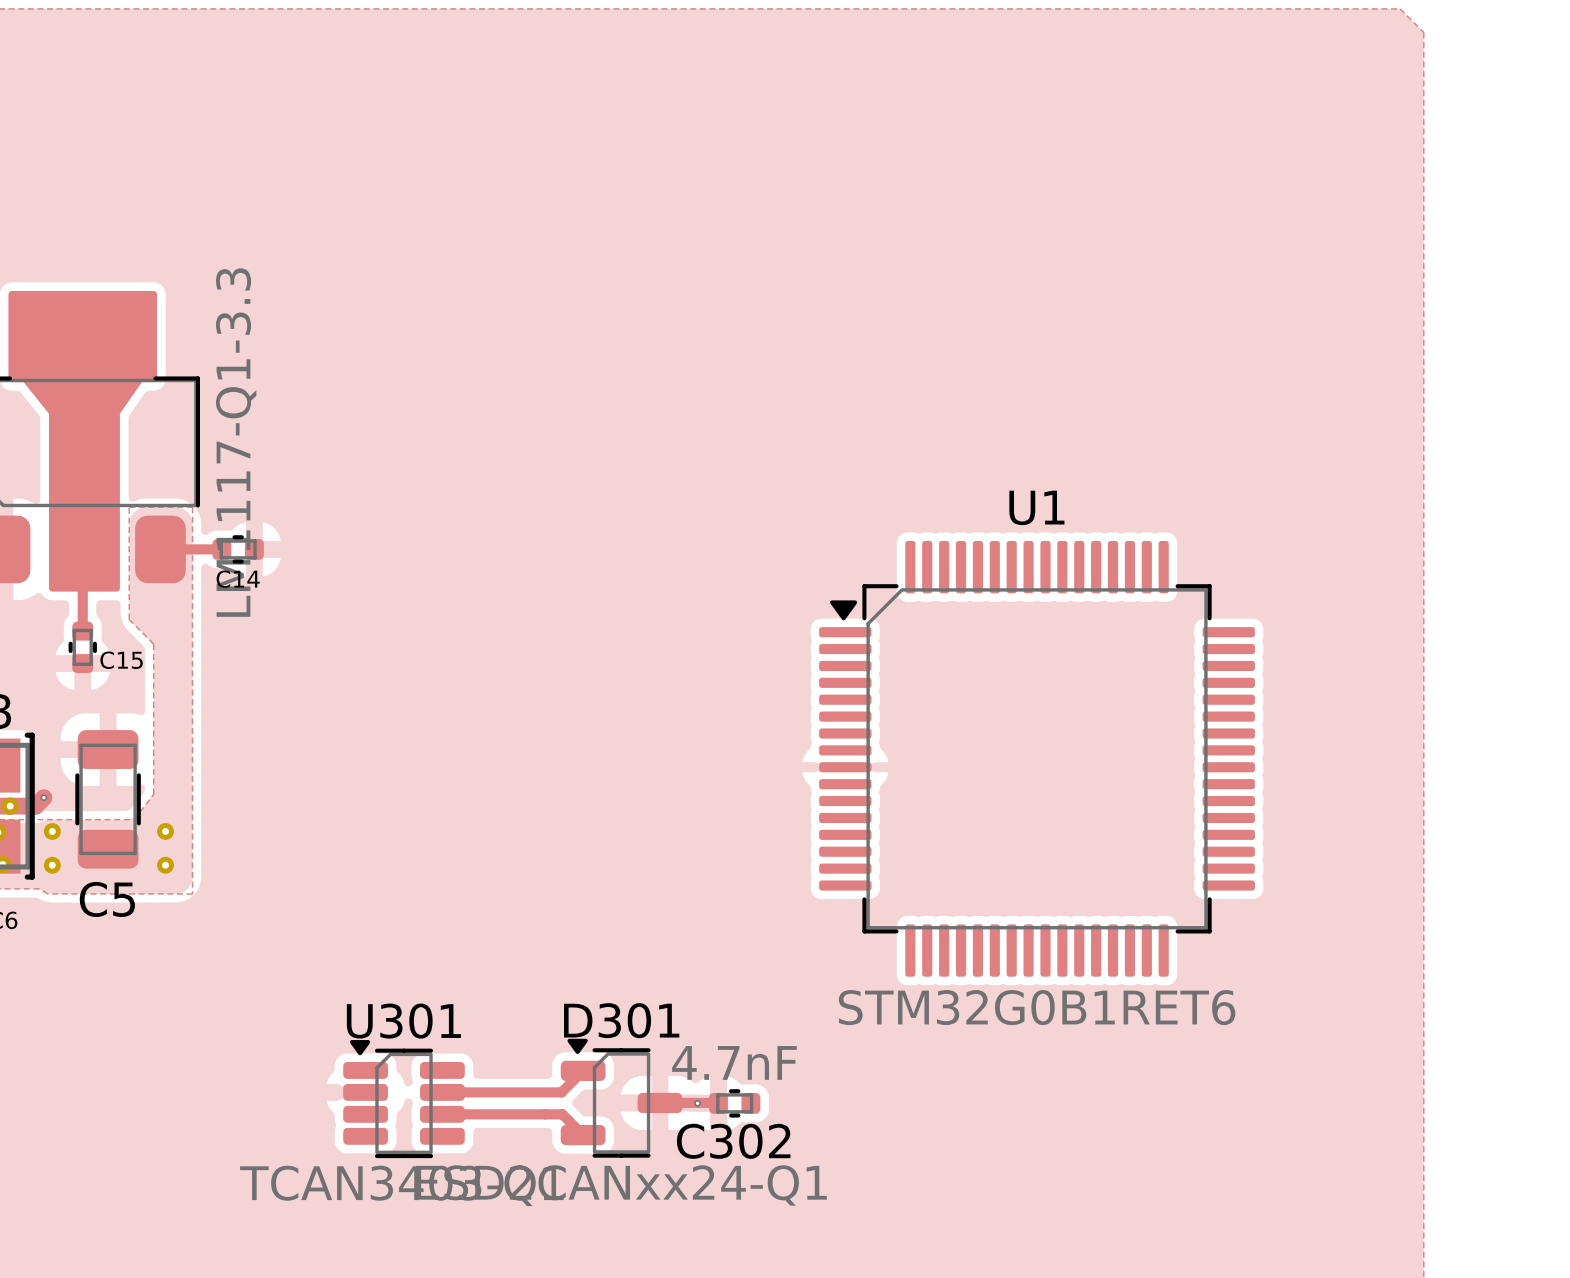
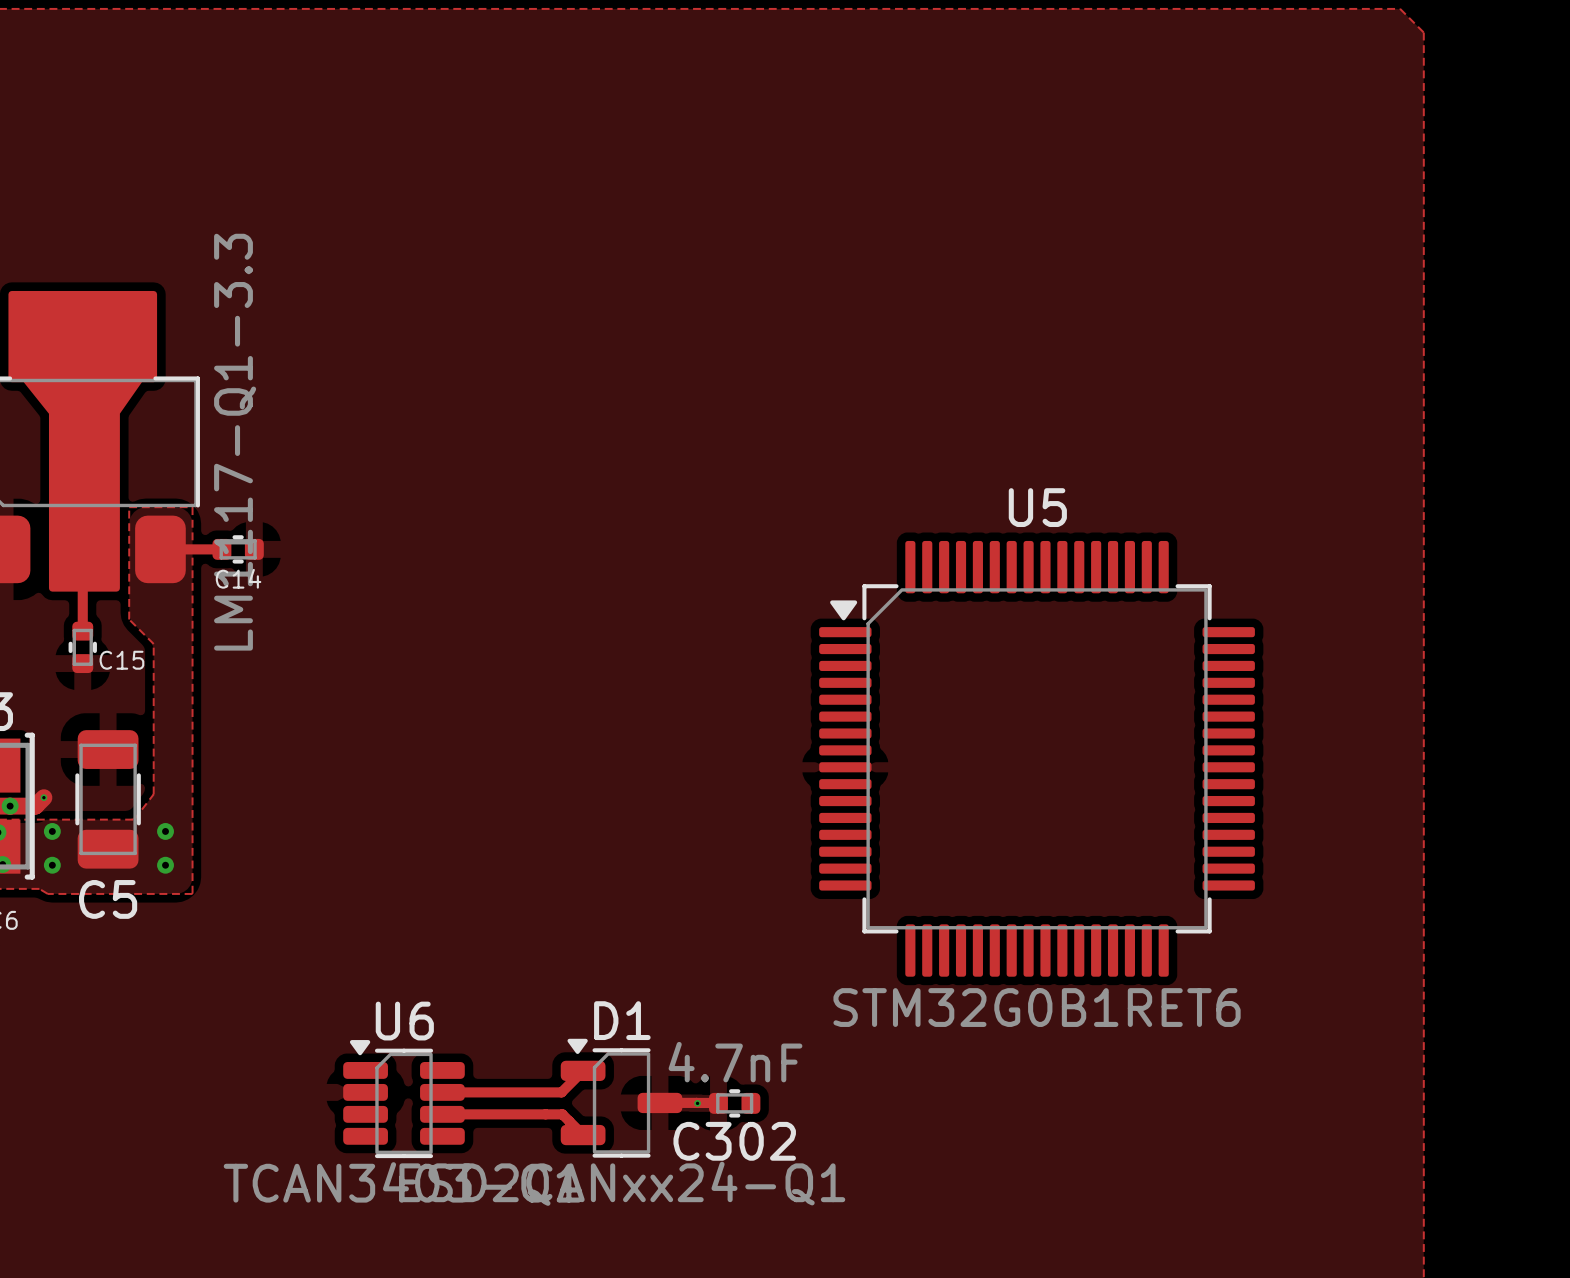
U1 name: U1 (1036, 507) -> U5 (1037, 507)
D301 name: D301 (621, 1020) -> D1 (622, 1020)
U301 name: U301 (403, 1021) -> U6 (404, 1021)

